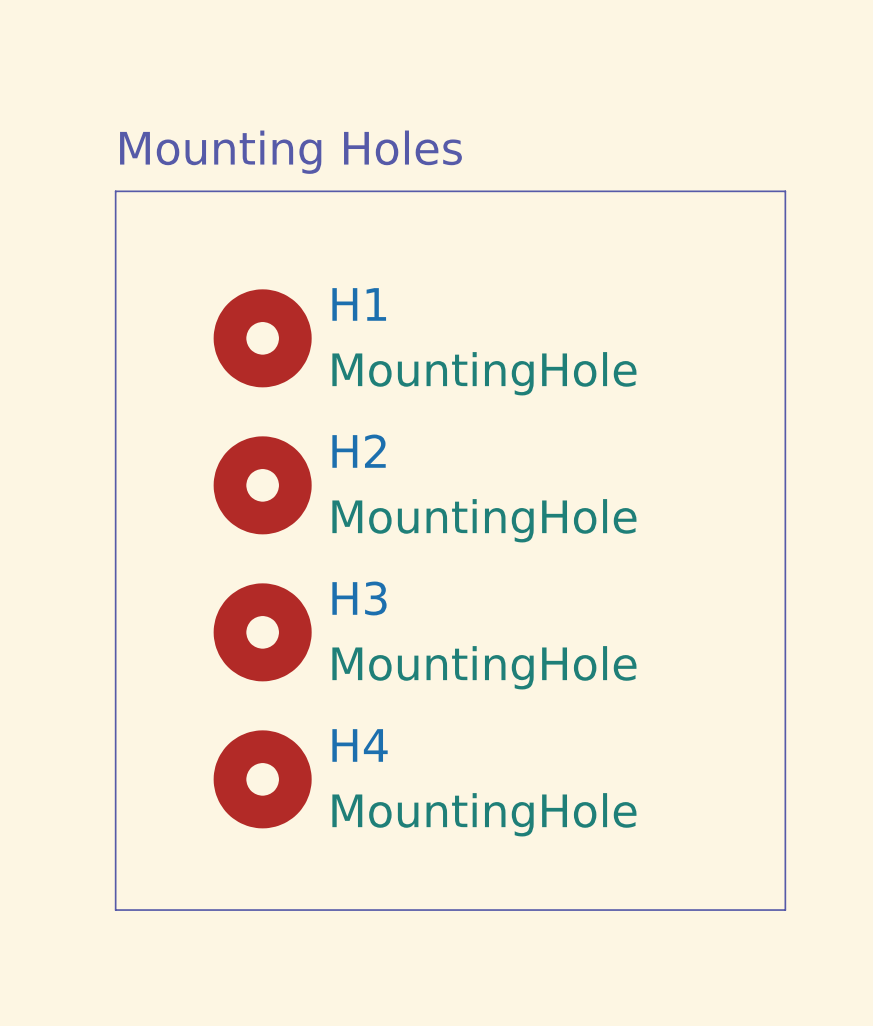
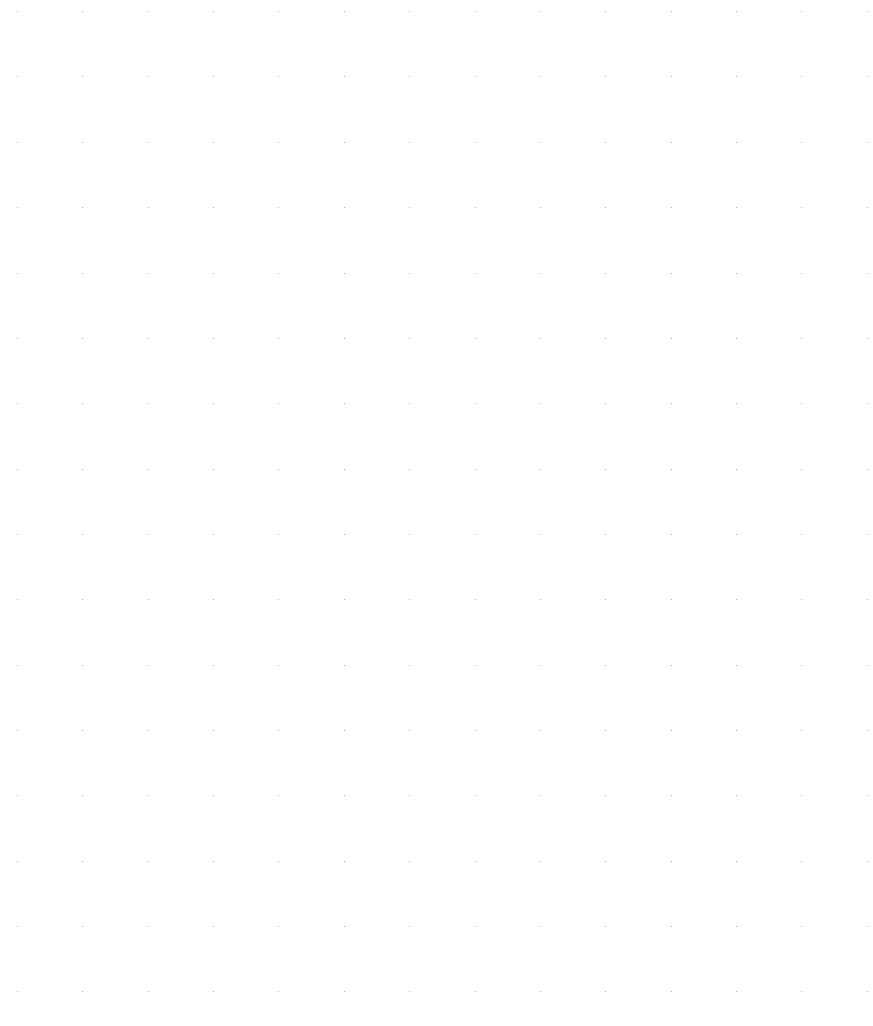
text: Mounting Holes (290, 152) -> none
line: (115, 191) (115, 910) (785, 910) (785, 191) (115, 191) -> none
H1: MountingHole (262, 338) -> none
H2: MountingHole (262, 485) -> none
H3: MountingHole (262, 632) -> none
H4: MountingHole (262, 779) -> none

